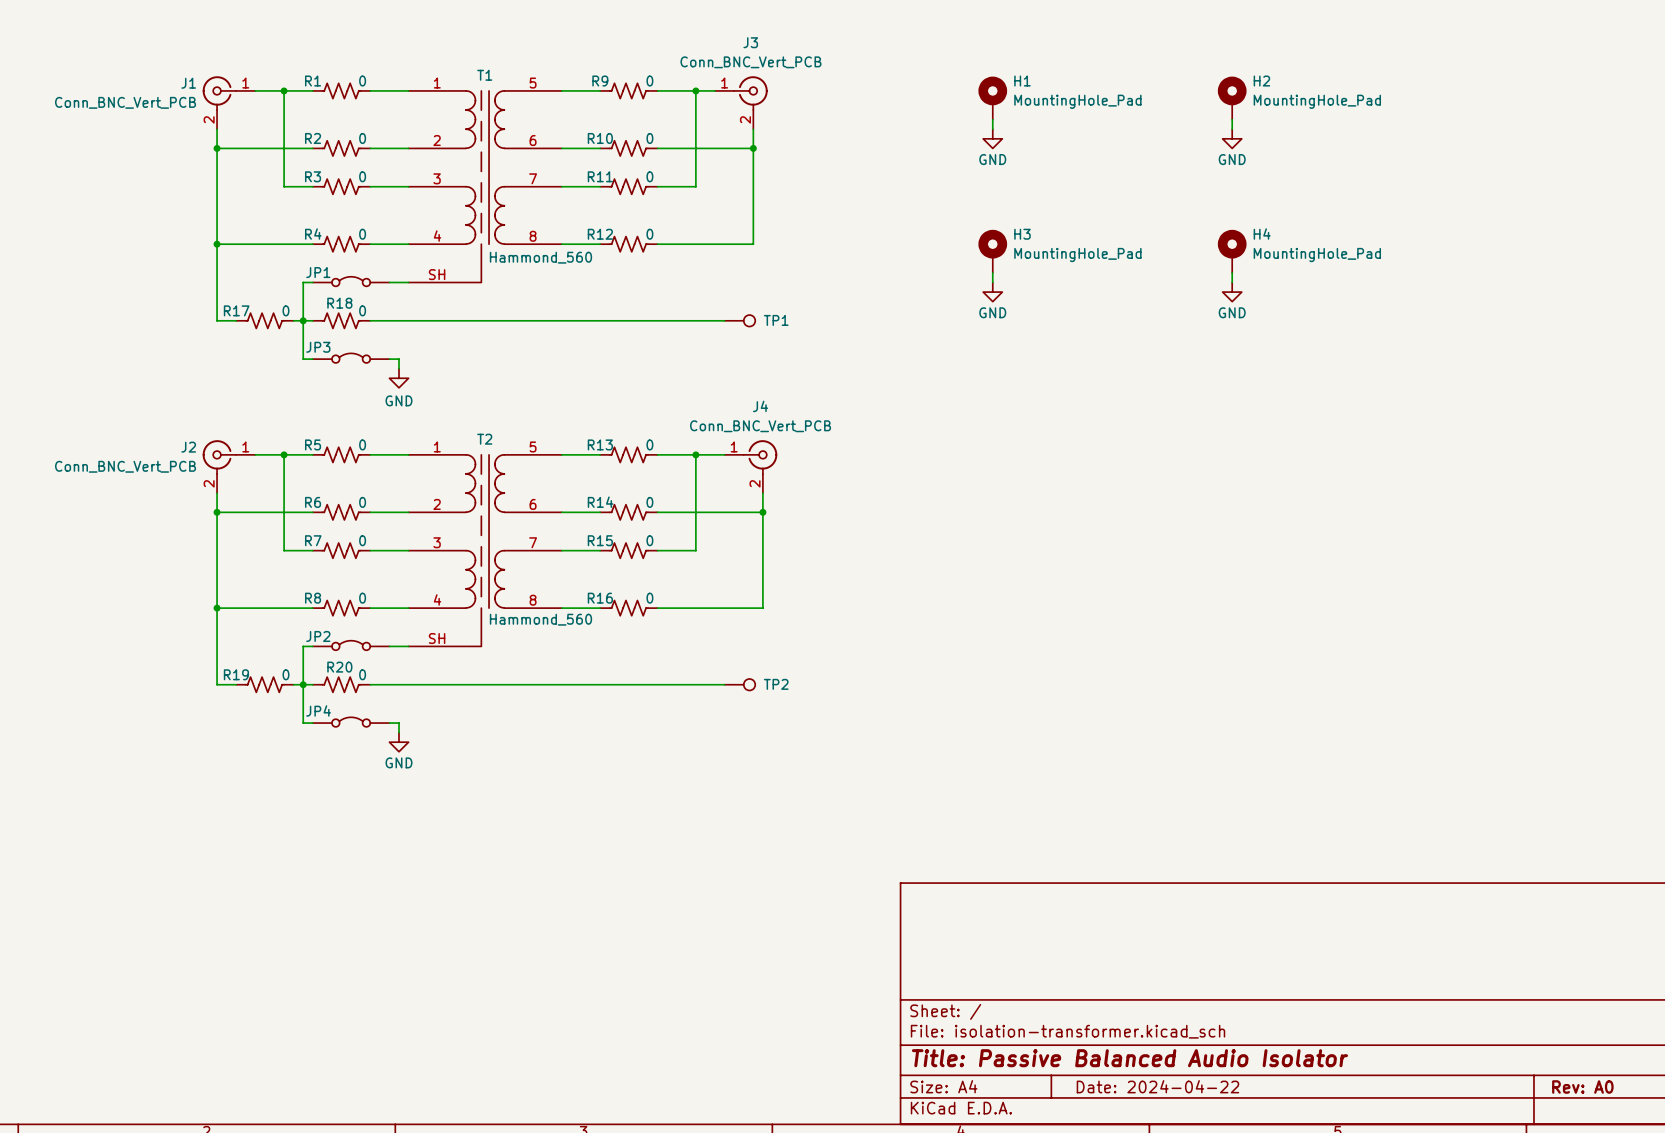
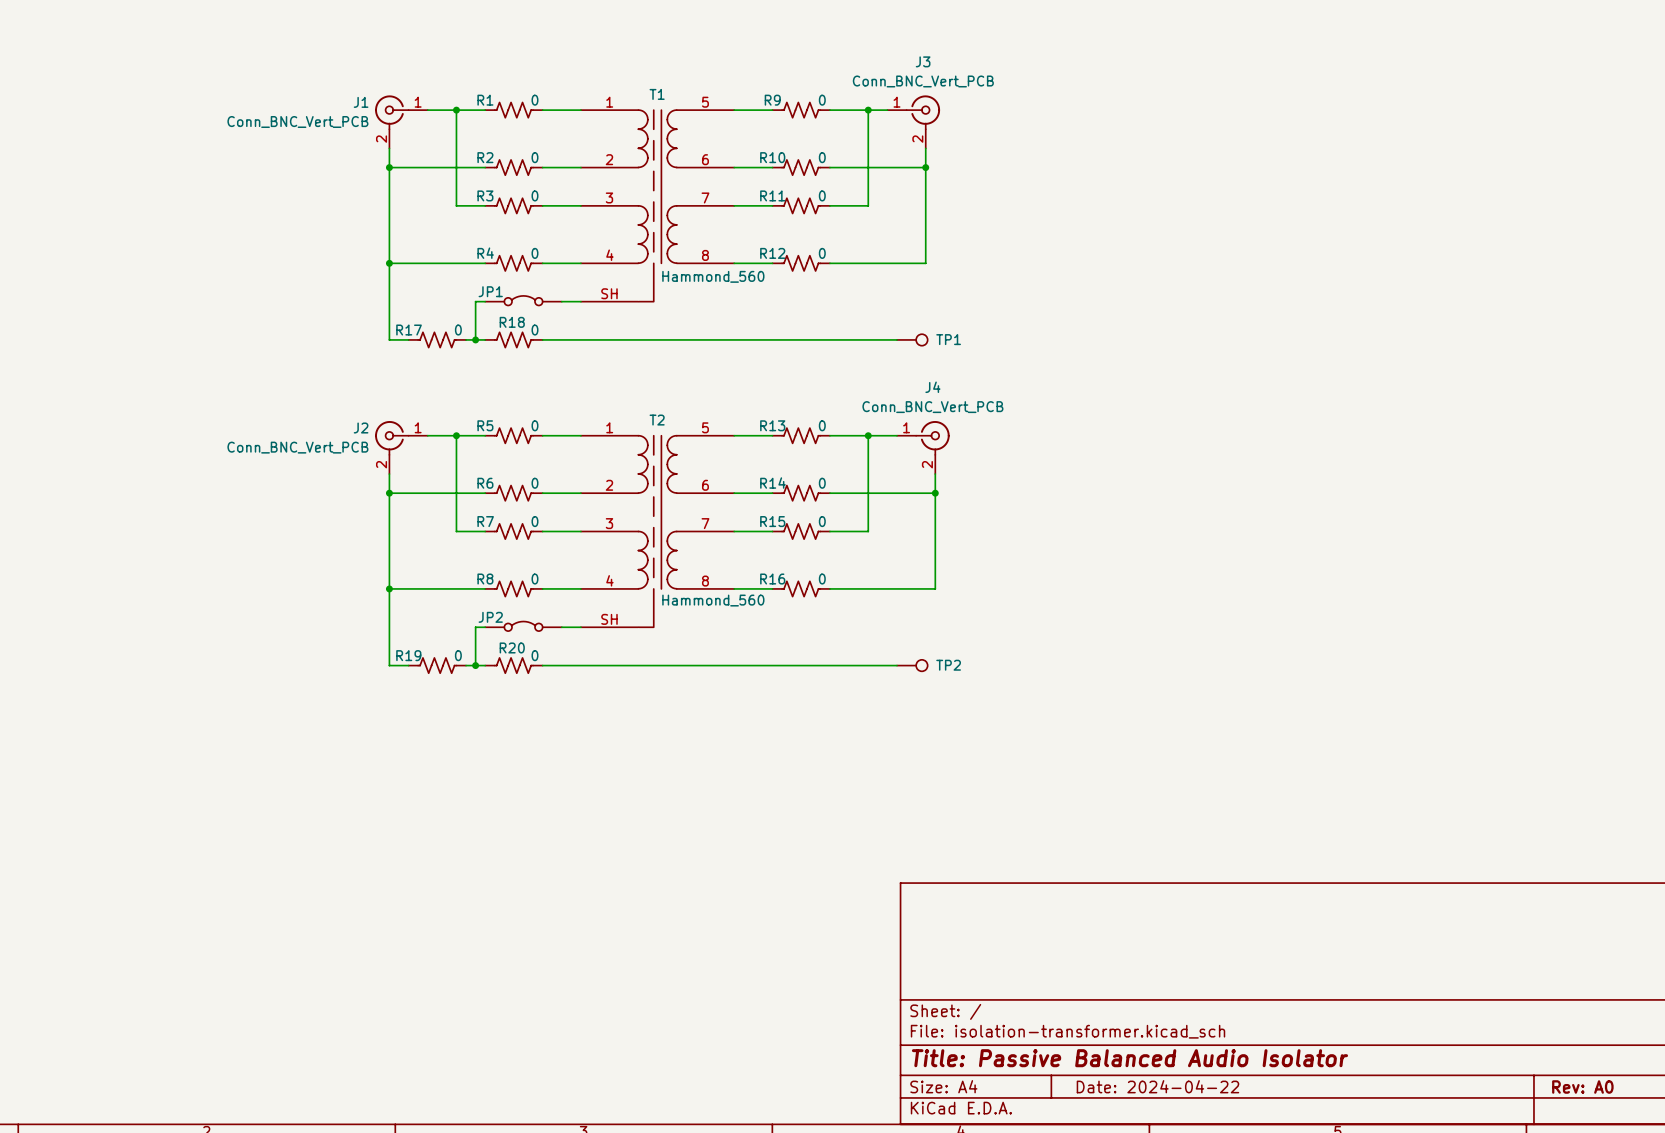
wire: (255, 90) (312, 90) -> (427, 110) (485, 110)
wire: (284, 90) (284, 186) (312, 186) -> (456, 110) (456, 205) (485, 205)
junction: (284, 90) -> none
R1 position: (341, 90) -> (513, 110)
wire: (370, 90) (408, 90) -> (542, 110) (580, 110)
wire: (561, 90) (600, 90) -> (734, 110) (772, 110)
R9 position: (628, 90) -> (801, 110)
wire: (657, 90) (715, 90) -> (829, 110) (887, 110)
wire: (695, 90) (695, 186) (657, 186) -> (868, 110) (868, 205) (829, 205)
junction: (695, 90) -> none
H1: MountingHole_Pad (992, 98) -> none
H2: MountingHole_Pad (1232, 98) -> none
J1 position: (229, 102) -> (401, 121)
J3 position: (741, 102) -> (913, 121)
junction: none -> (456, 110)
junction: none -> (868, 110)
wire: (992, 119) (992, 129) -> none
wire: (1232, 119) (1232, 129) -> none
wire: (217, 129) (217, 320) (236, 320) -> (389, 148) (389, 339) (408, 339)
wire: (753, 129) (753, 244) (657, 244) -> (925, 148) (925, 263) (829, 263)
power symbol: GND (992, 138) -> none
power symbol: GND (1232, 138) -> none
wire: (217, 148) (312, 148) -> (389, 167) (485, 167)
junction: (217, 148) -> none
R2 position: (341, 148) -> (513, 167)
wire: (370, 148) (408, 148) -> (542, 205) (580, 205)
wire: (561, 148) (600, 148) -> (734, 205) (772, 205)
R10 position: (628, 148) -> (801, 167)
wire: (657, 148) (753, 148) -> (829, 167) (925, 167)
junction: (753, 148) -> none
junction: none -> (389, 167)
junction: none -> (925, 167)
R3 position: (341, 186) -> (513, 205)
wire: (370, 186) (408, 186) -> (542, 167) (580, 167)
T1 position: (485, 186) -> (657, 205)
wire: (561, 186) (600, 186) -> (734, 167) (772, 167)
R11 position: (628, 186) -> (801, 205)
wire: (217, 244) (312, 244) -> (389, 263) (485, 263)
junction: (217, 244) -> none
R4 position: (341, 244) -> (513, 263)
wire: (370, 244) (408, 244) -> (542, 263) (580, 263)
wire: (561, 244) (600, 244) -> (734, 263) (772, 263)
R12 position: (628, 244) -> (801, 263)
H3: MountingHole_Pad (992, 251) -> none
H4: MountingHole_Pad (1232, 251) -> none
junction: none -> (389, 263)
wire: (992, 272) (992, 282) -> none
wire: (1232, 272) (1232, 282) -> none
JP1 position: (351, 281) -> (523, 300)
wire: (312, 282) (303, 282) (303, 359) (312, 359) -> none
wire: (389, 282) (408, 282) -> (561, 301) (580, 301)
power symbol: GND (992, 292) -> none
power symbol: GND (1232, 292) -> none
wire: none -> (485, 301) (475, 301) (475, 339)
R17 position: (264, 320) -> (437, 339)
wire: (293, 320) (312, 320) -> (466, 339) (485, 339)
junction: (303, 320) -> none
R18 position: (341, 320) -> (513, 339)
wire: (370, 320) (724, 320) -> (542, 339) (897, 339)
TP1 position: (739, 320) -> (912, 339)
junction: none -> (475, 339)
JP3: (351, 358) -> none
wire: (389, 359) (399, 359) (399, 368) -> none
power symbol: GND (399, 378) -> none
junction: none -> (456, 435)
junction: none -> (868, 435)
wire: (255, 454) (312, 454) -> (427, 435) (485, 435)
wire: (284, 454) (284, 550) (312, 550) -> (456, 435) (456, 531) (485, 531)
junction: (284, 454) -> none
R5 position: (341, 454) -> (513, 435)
wire: (370, 454) (408, 454) -> (542, 435) (580, 435)
wire: (561, 454) (600, 454) -> (734, 435) (772, 435)
R13 position: (628, 454) -> (801, 435)
wire: (657, 454) (724, 454) -> (829, 435) (897, 435)
wire: (695, 454) (695, 550) (657, 550) -> (868, 435) (868, 531) (829, 531)
junction: (695, 454) -> none
J2 position: (229, 466) -> (401, 447)
J4 position: (750, 466) -> (923, 447)
wire: (217, 493) (217, 684) (236, 684) -> (389, 474) (389, 665) (408, 665)
junction: none -> (389, 493)
wire: (762, 493) (762, 608) (657, 608) -> (935, 474) (935, 588) (829, 588)
junction: none -> (935, 493)
wire: (217, 512) (312, 512) -> (389, 493) (485, 493)
junction: (217, 512) -> none
R6 position: (341, 512) -> (513, 493)
wire: (370, 512) (408, 512) -> (542, 531) (580, 531)
wire: (561, 512) (600, 512) -> (734, 531) (772, 531)
R14 position: (628, 512) -> (801, 493)
wire: (657, 512) (762, 512) -> (829, 493) (935, 493)
junction: (762, 512) -> none
R7 position: (341, 550) -> (513, 531)
wire: (370, 550) (408, 550) -> (542, 493) (580, 493)
T2 position: (485, 550) -> (657, 531)
wire: (561, 550) (600, 550) -> (734, 493) (772, 493)
R15 position: (628, 550) -> (801, 531)
junction: none -> (389, 588)
wire: (217, 608) (312, 608) -> (389, 588) (485, 588)
junction: (217, 608) -> none
R8 position: (341, 608) -> (513, 588)
wire: (370, 608) (408, 608) -> (542, 588) (580, 588)
wire: (561, 608) (600, 608) -> (734, 588) (772, 588)
R16 position: (628, 608) -> (801, 588)
wire: none -> (485, 627) (475, 627) (475, 665)
JP2 position: (351, 645) -> (523, 626)
wire: (312, 646) (303, 646) (303, 723) (312, 723) -> none
wire: (389, 646) (408, 646) -> (561, 627) (580, 627)
junction: none -> (475, 665)
R19 position: (264, 684) -> (437, 665)
wire: (293, 684) (312, 684) -> (466, 665) (485, 665)
junction: (303, 684) -> none
R20 position: (341, 684) -> (513, 665)
wire: (370, 684) (724, 684) -> (542, 665) (897, 665)
TP2 position: (739, 684) -> (912, 665)
JP4: (351, 722) -> none
wire: (389, 723) (399, 723) (399, 732) -> none
power symbol: GND (399, 742) -> none

